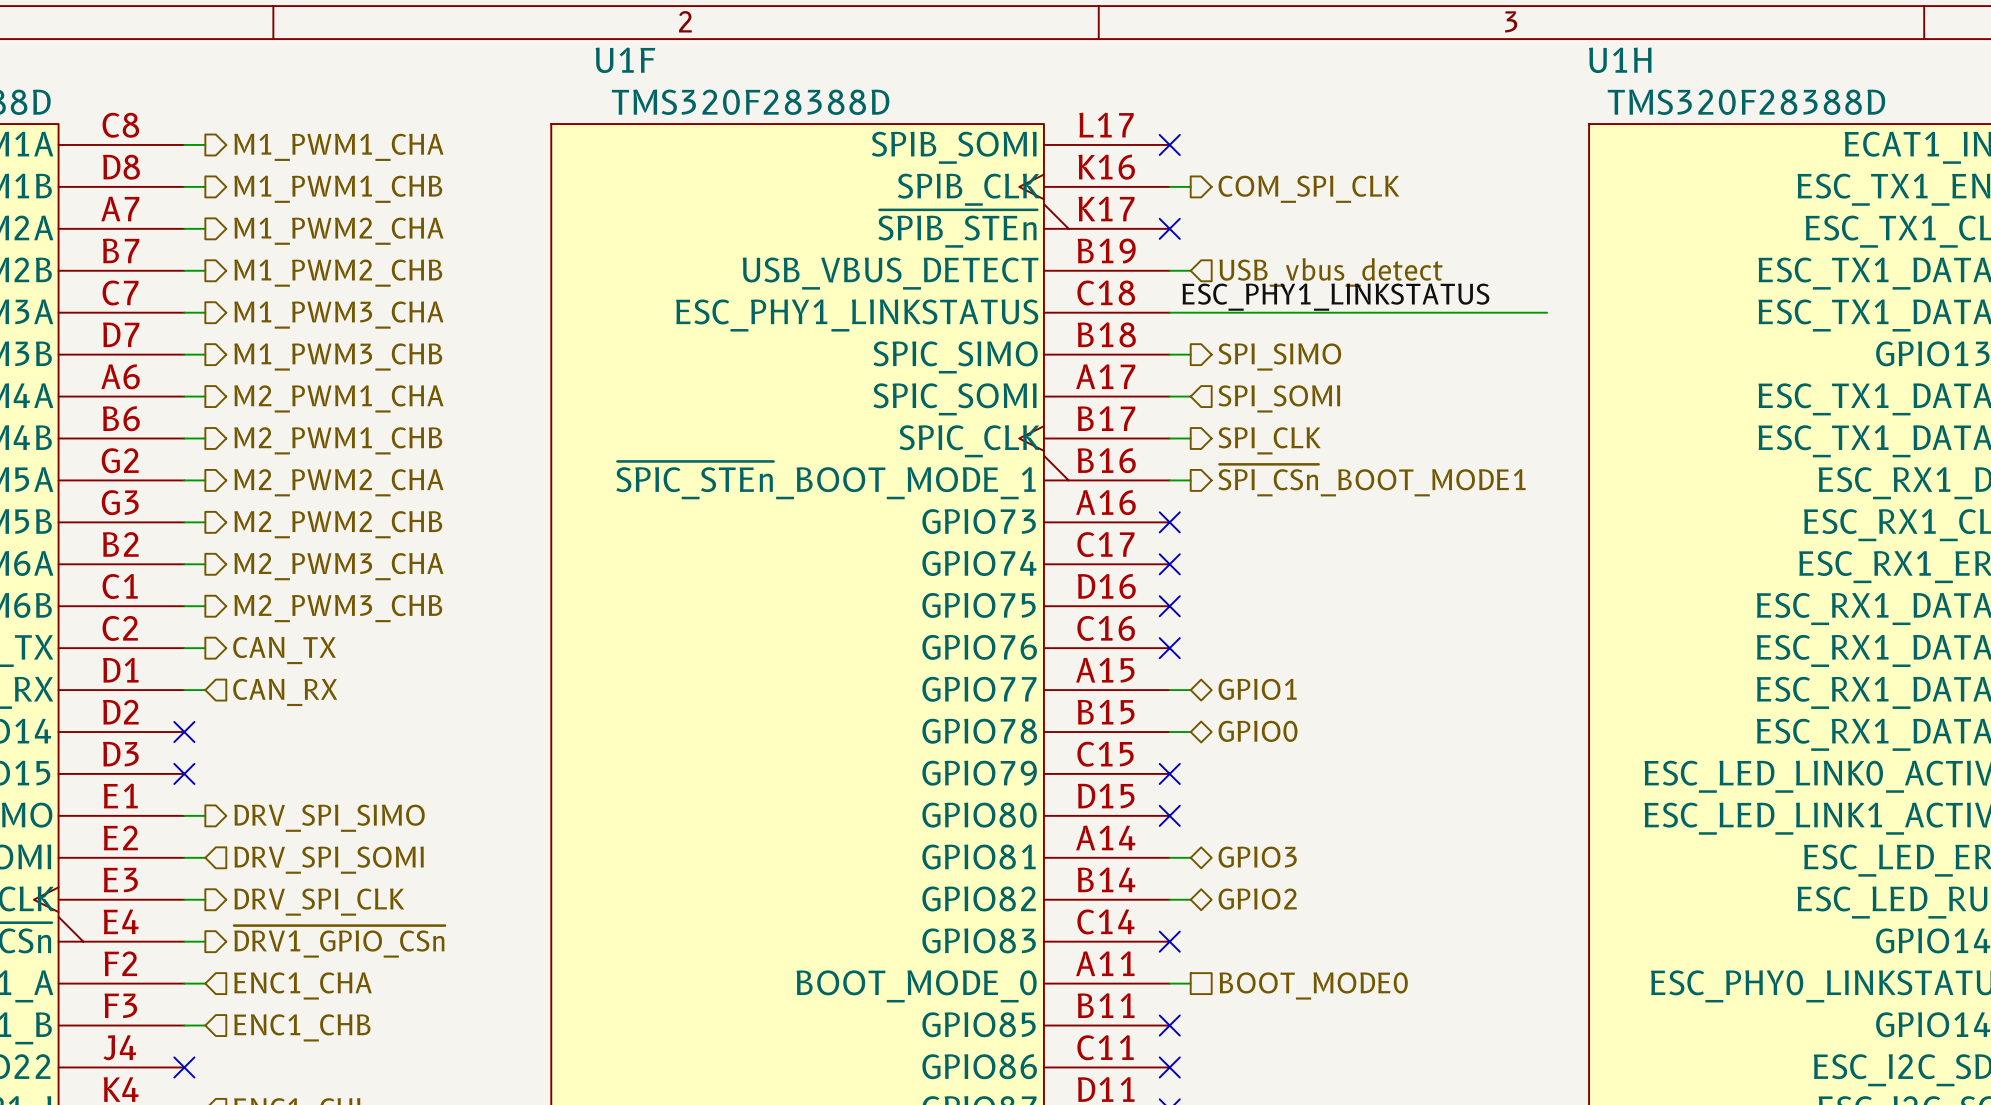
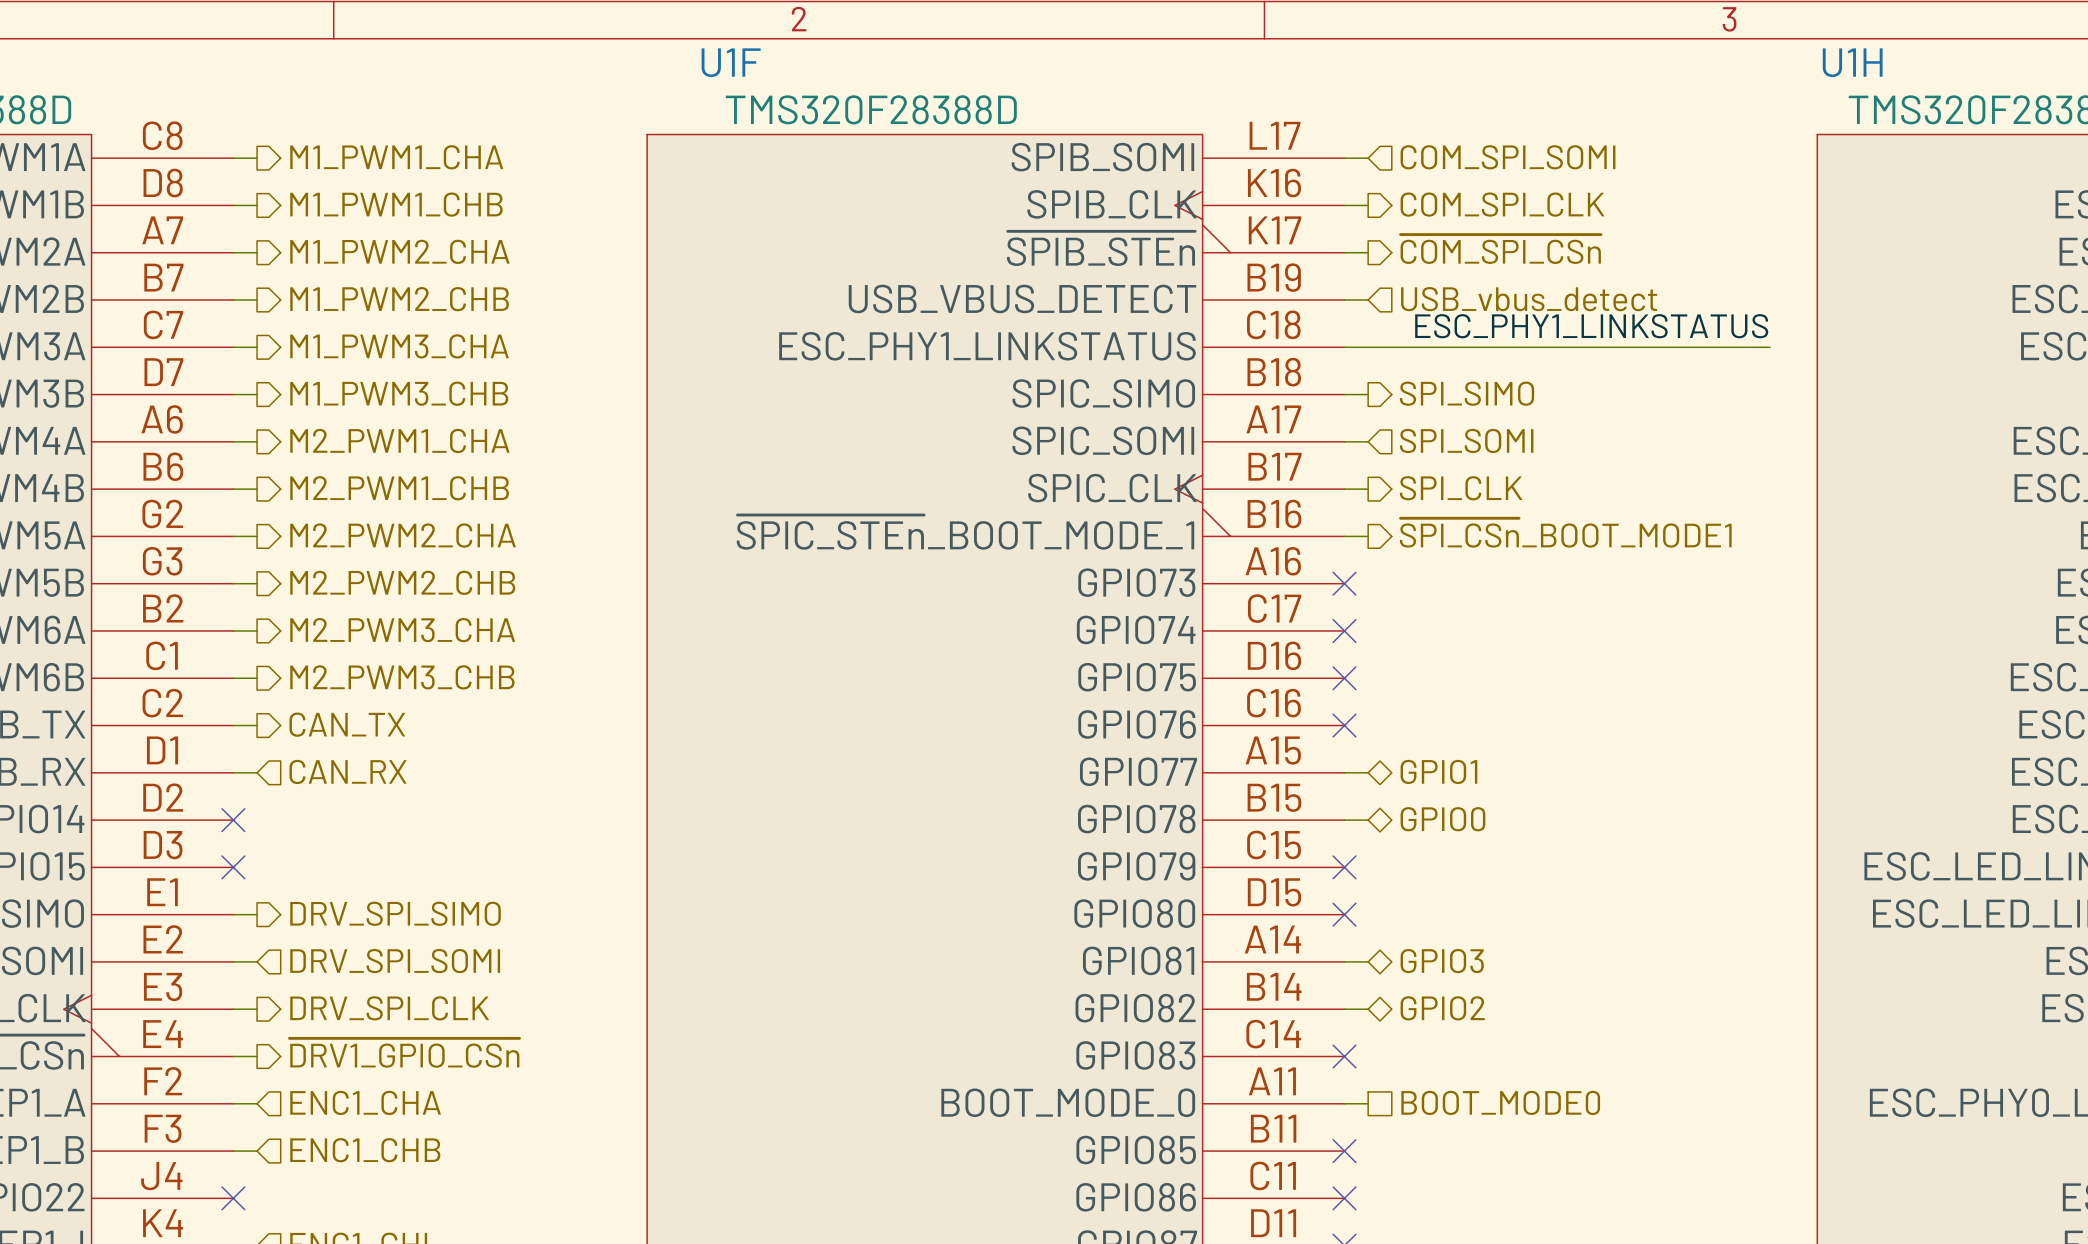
wire: none -> (1344, 158) (1368, 158)
no-connect mark: (1169, 144) -> none
hierarchical label: none -> COM_SPI_SOMI (1508, 157)
wire: none -> (1344, 252) (1368, 252)
no-connect mark: (1169, 228) -> none
hierarchical label: none -> ~{COM_SPI_CSn} (1500, 249)
label position: ESC_PHY1_LINKSTATUS (1335, 297) -> ESC_PHY1_LINKSTATUS (1591, 326)

